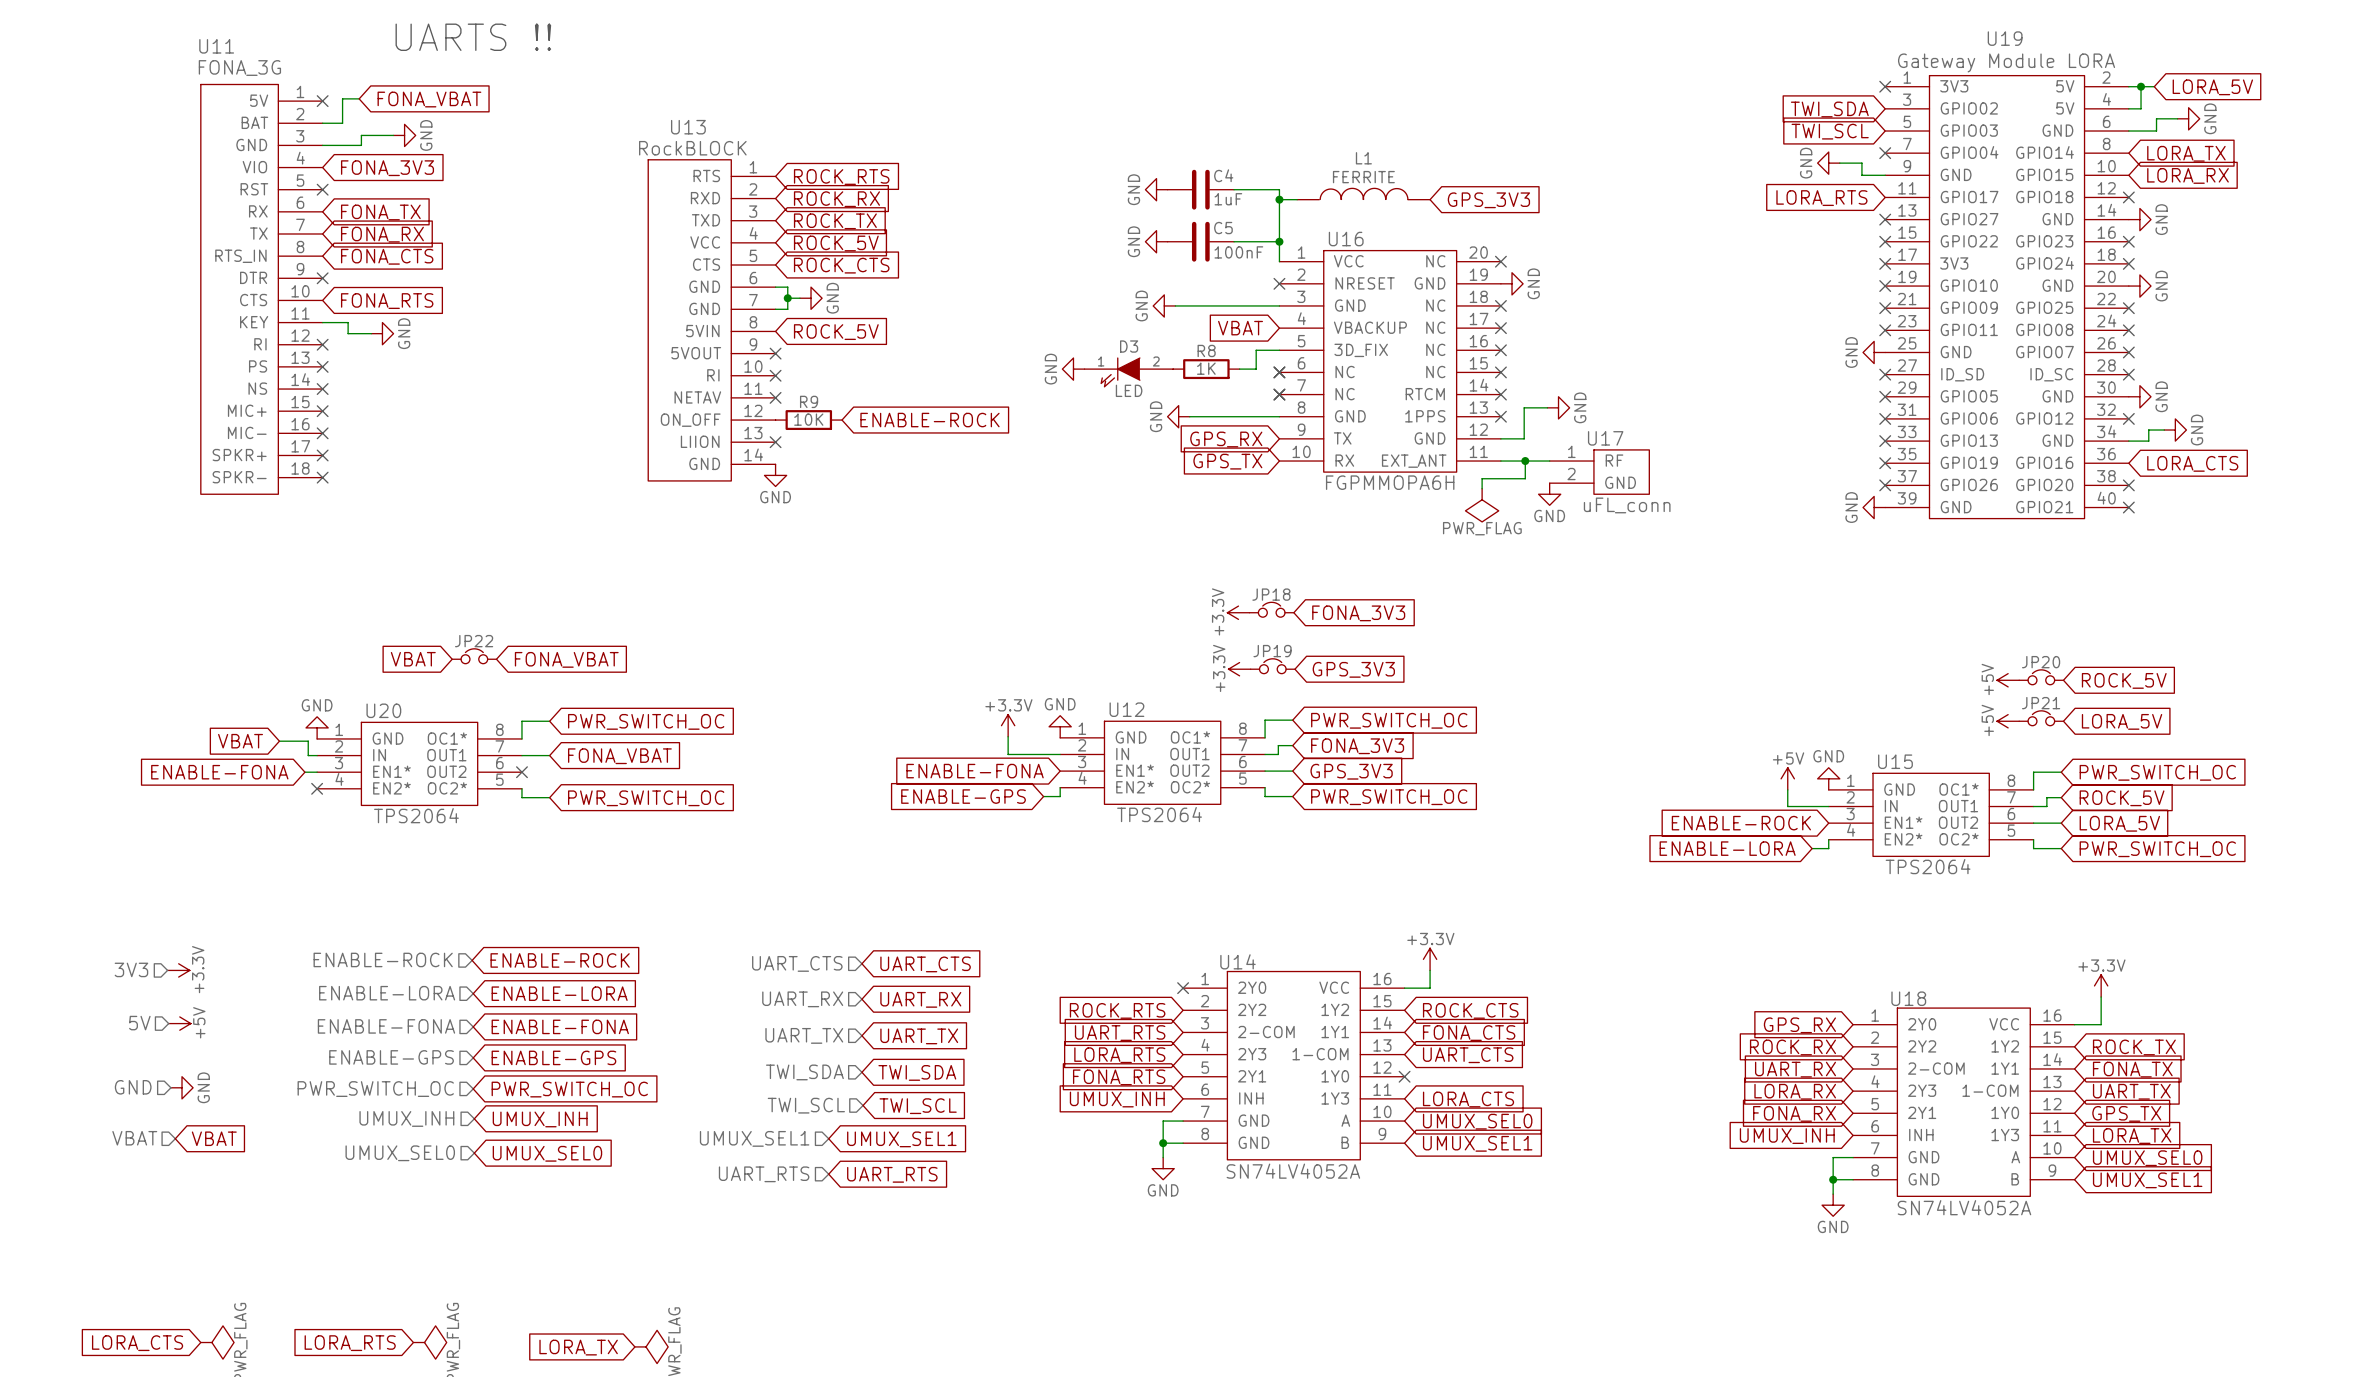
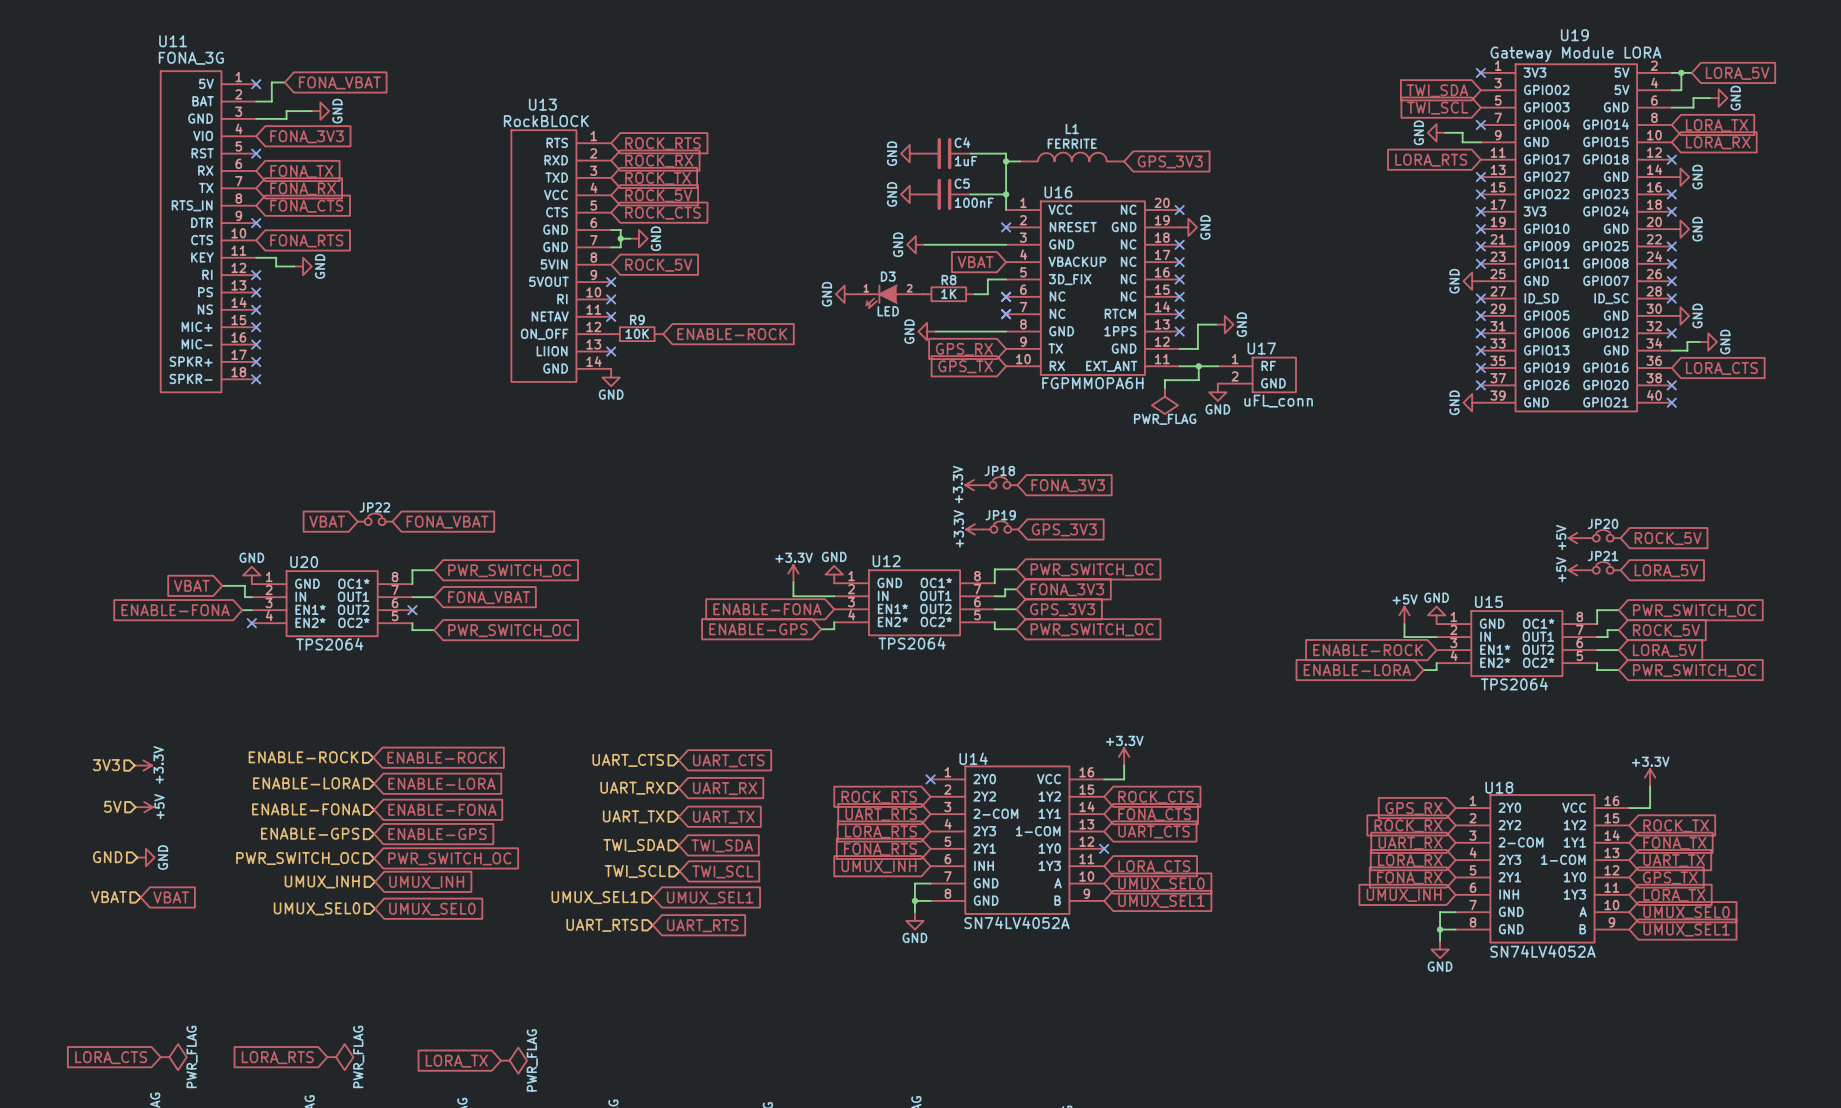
text: UARTS !! (473, 37) -> none

